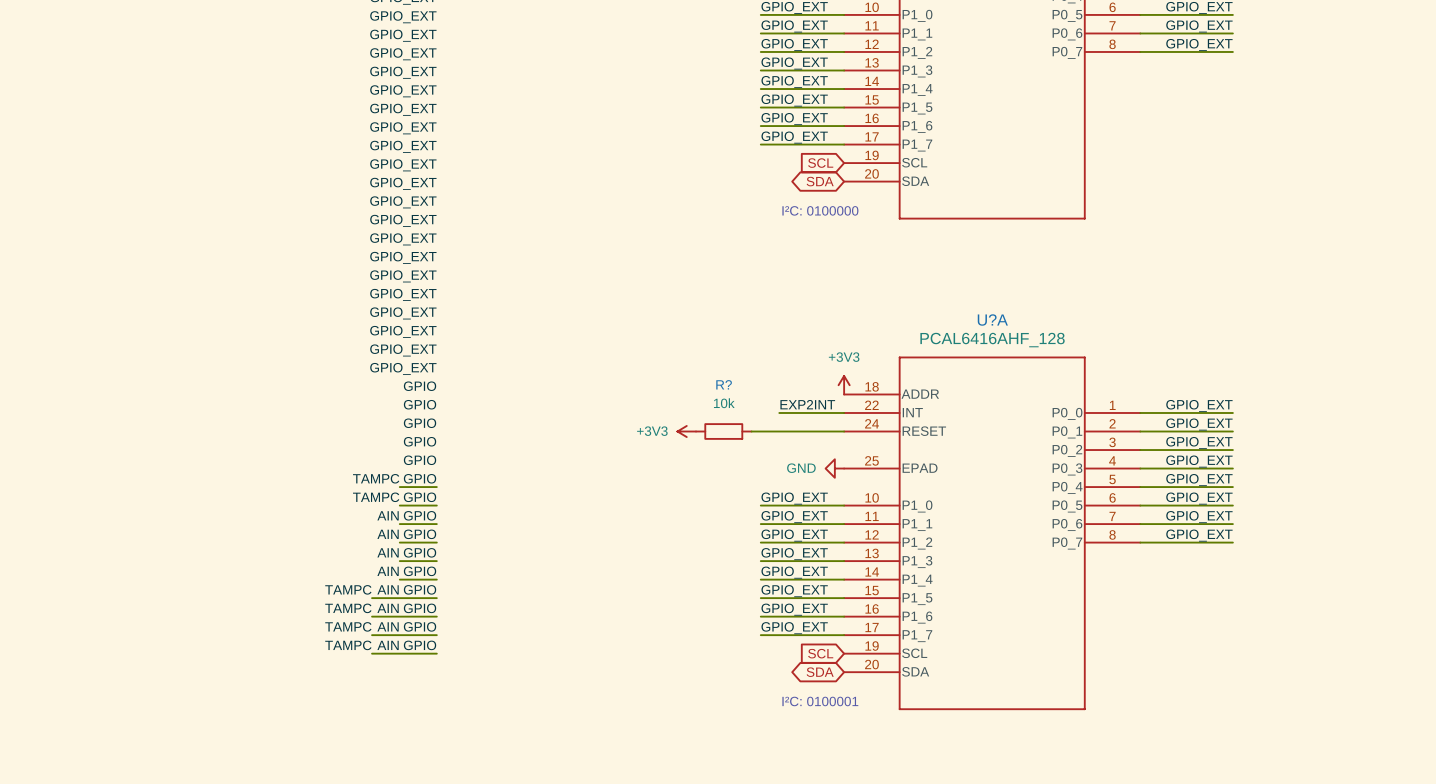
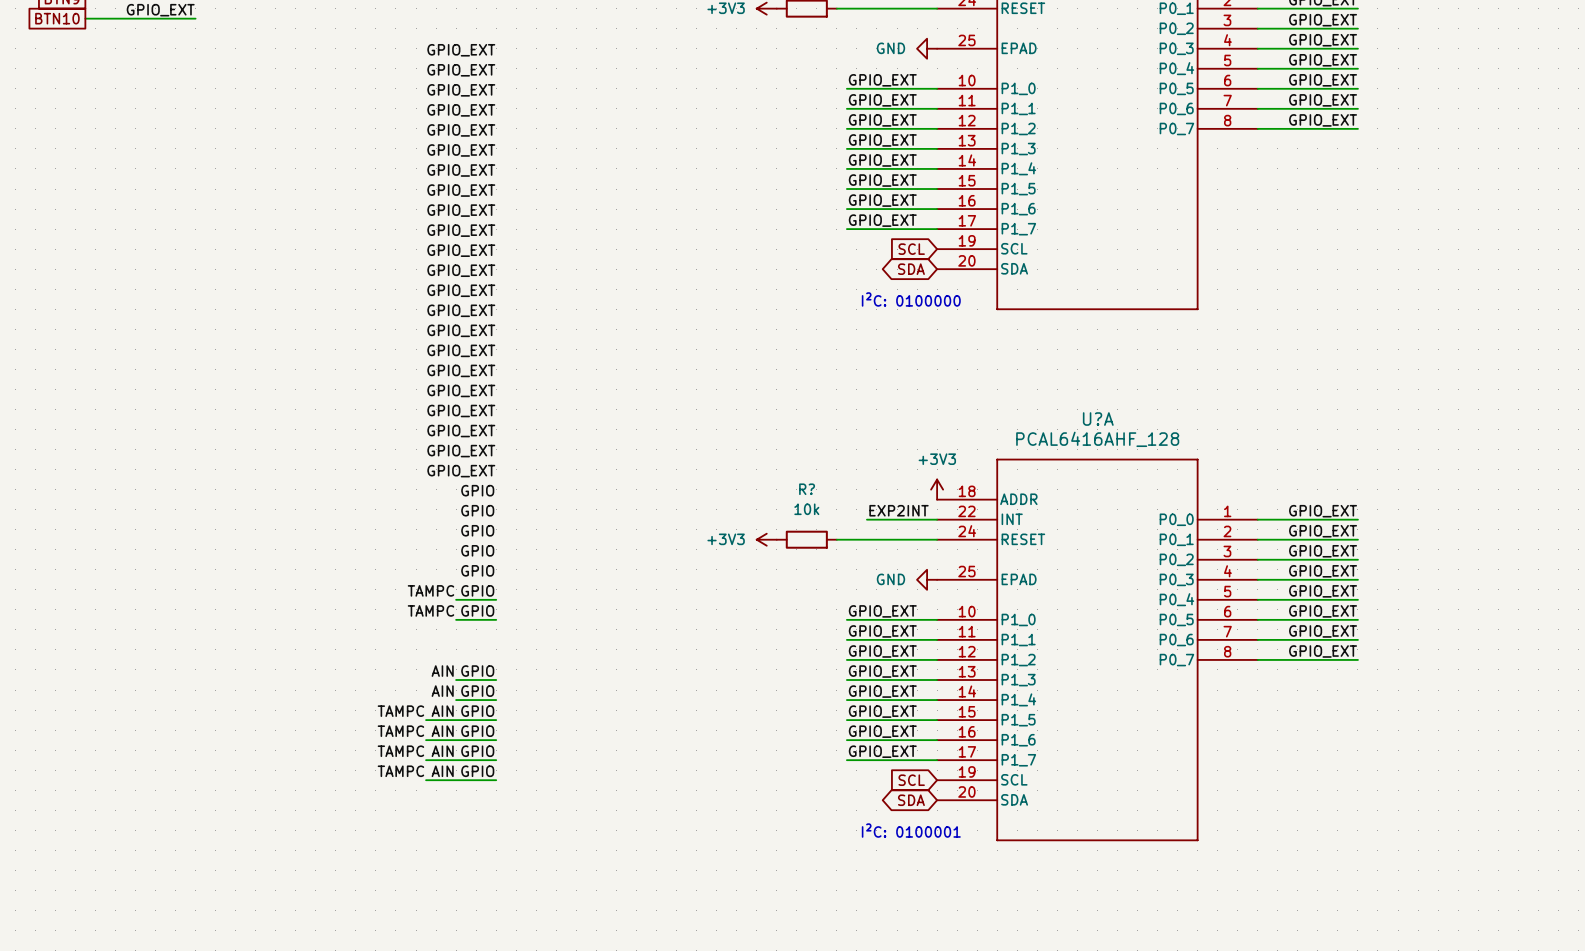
label: AIN (388, 515) -> none
label: GPIO (420, 515) -> none
wire: (399, 524) (436, 524) -> none
label: AIN (388, 534) -> none
label: GPIO (420, 534) -> none
wire: (399, 542) (436, 542) -> none

